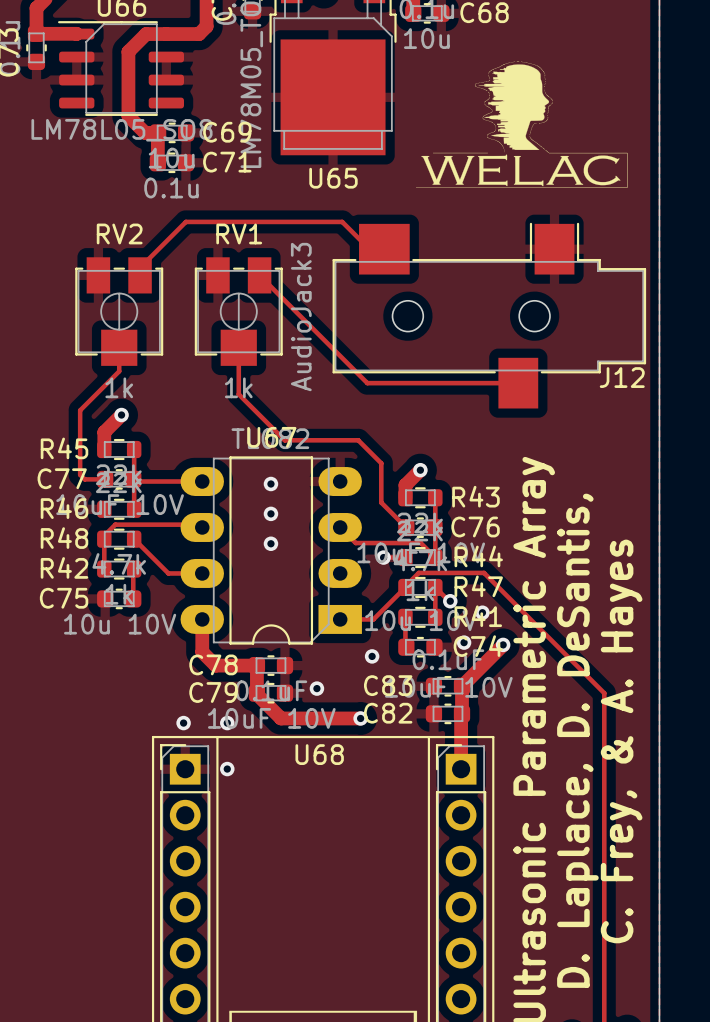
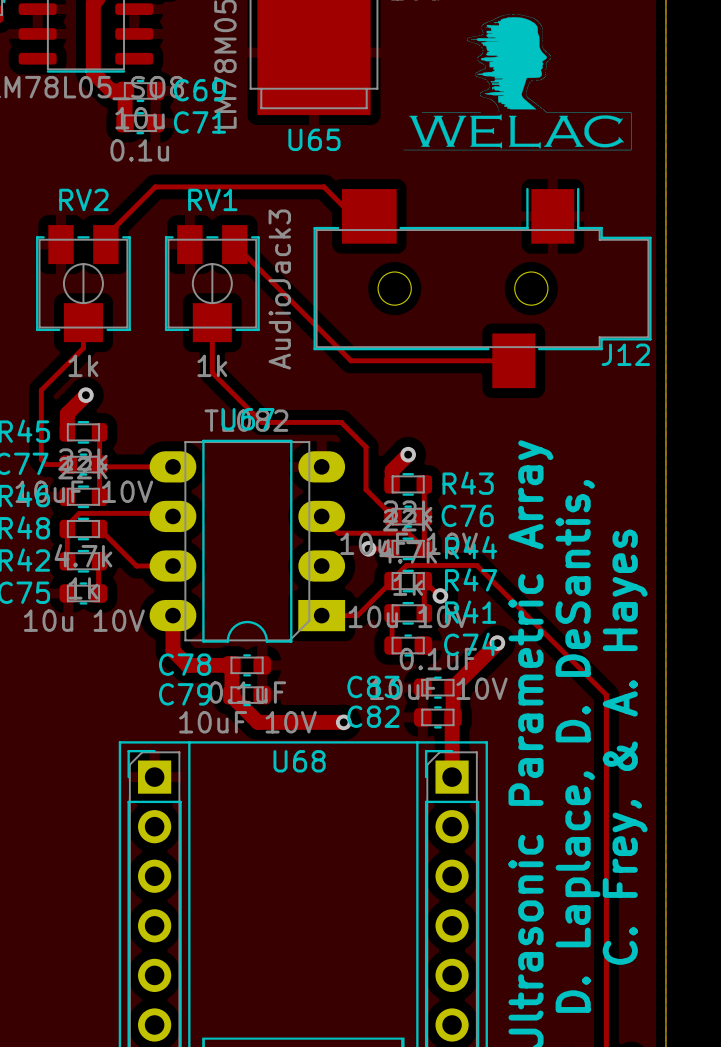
via: (270, 483) -> none
via: (270, 513) -> none
via: (270, 543) -> none
via: (482, 612) -> none
via: (464, 642) -> none
via: (372, 656) -> none
via: (316, 688) -> none
via: (183, 723) -> none
via: (227, 723) -> none
via: (227, 769) -> none

